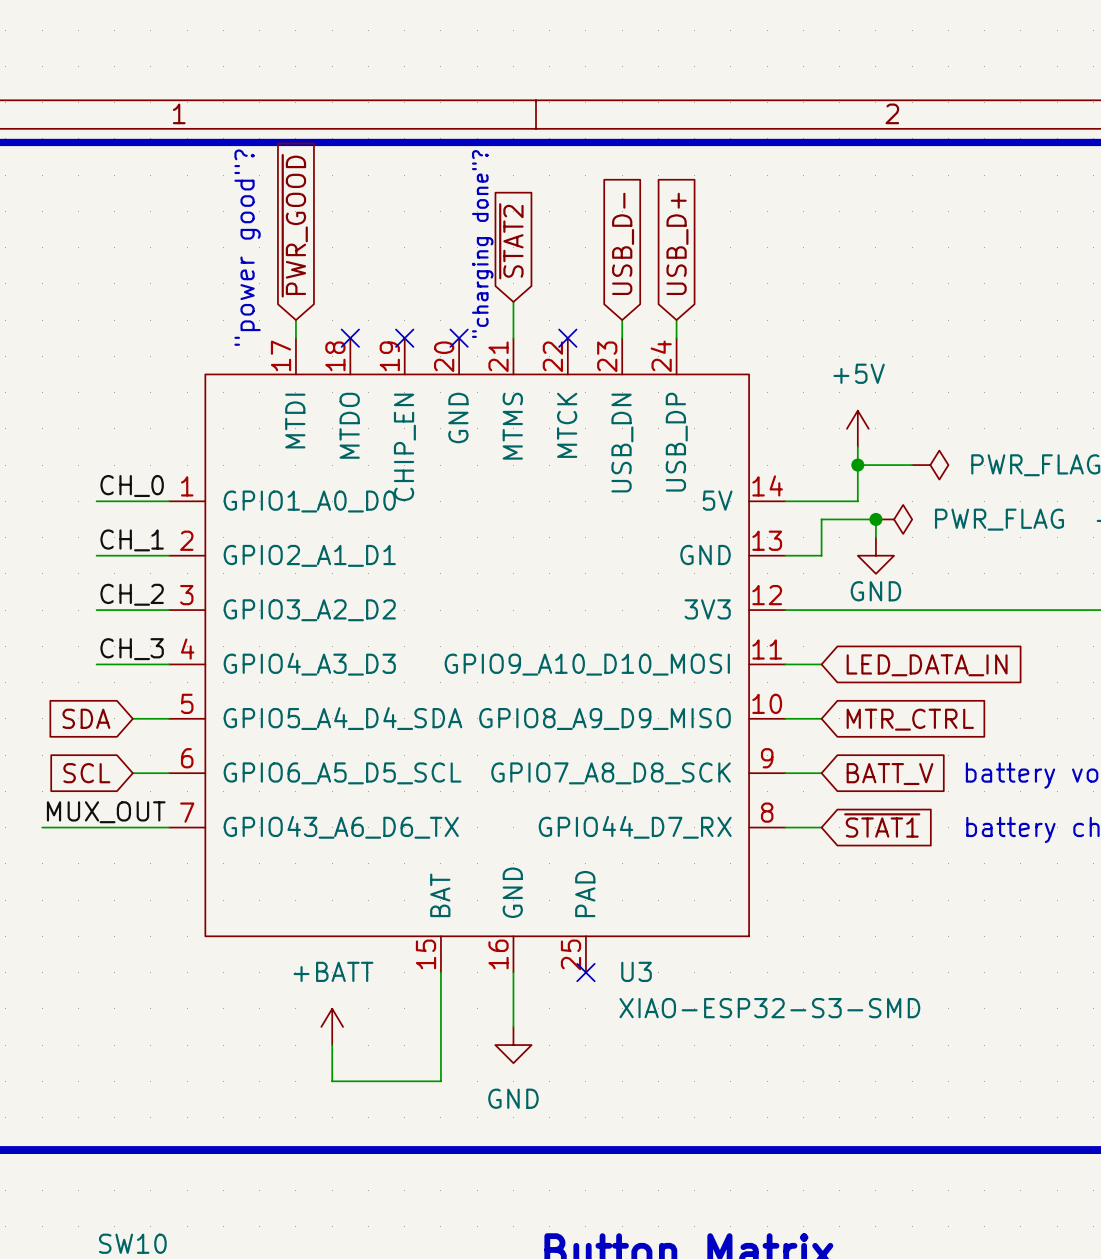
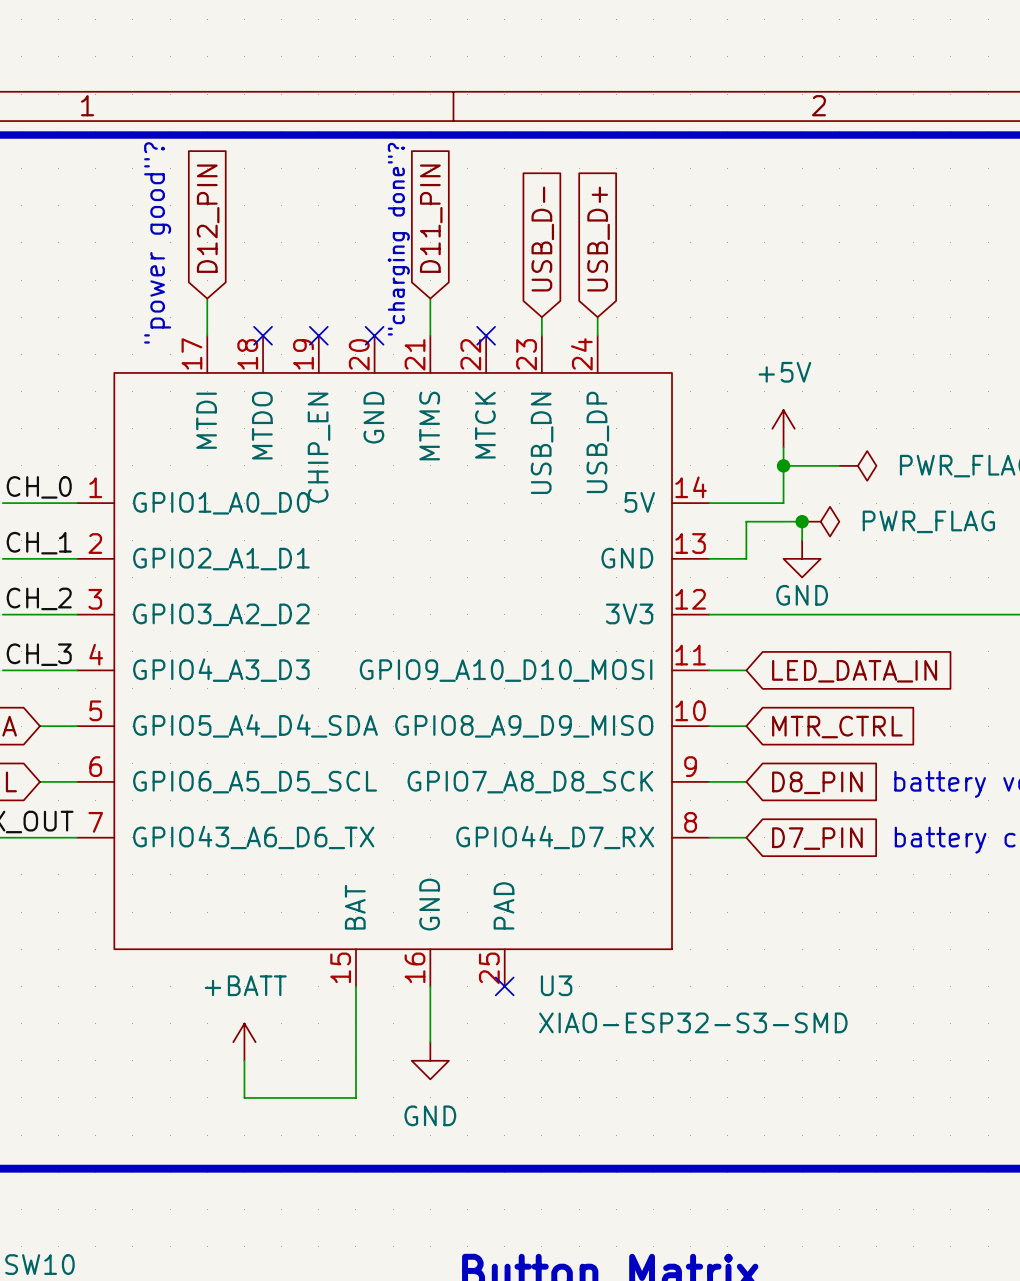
global label: none -> D12_PIN (208, 218)
global label: ~{PWR_GOOD} (294, 225) -> none
global label: ~{STAT2} (511, 241) -> D11_PIN (431, 218)
wire: none -> (207, 298) (207, 317)
global label: BATT_V (890, 774) -> D8_PIN (817, 782)
global label: ~{STAT1} (882, 825) -> D7_PIN (817, 838)

